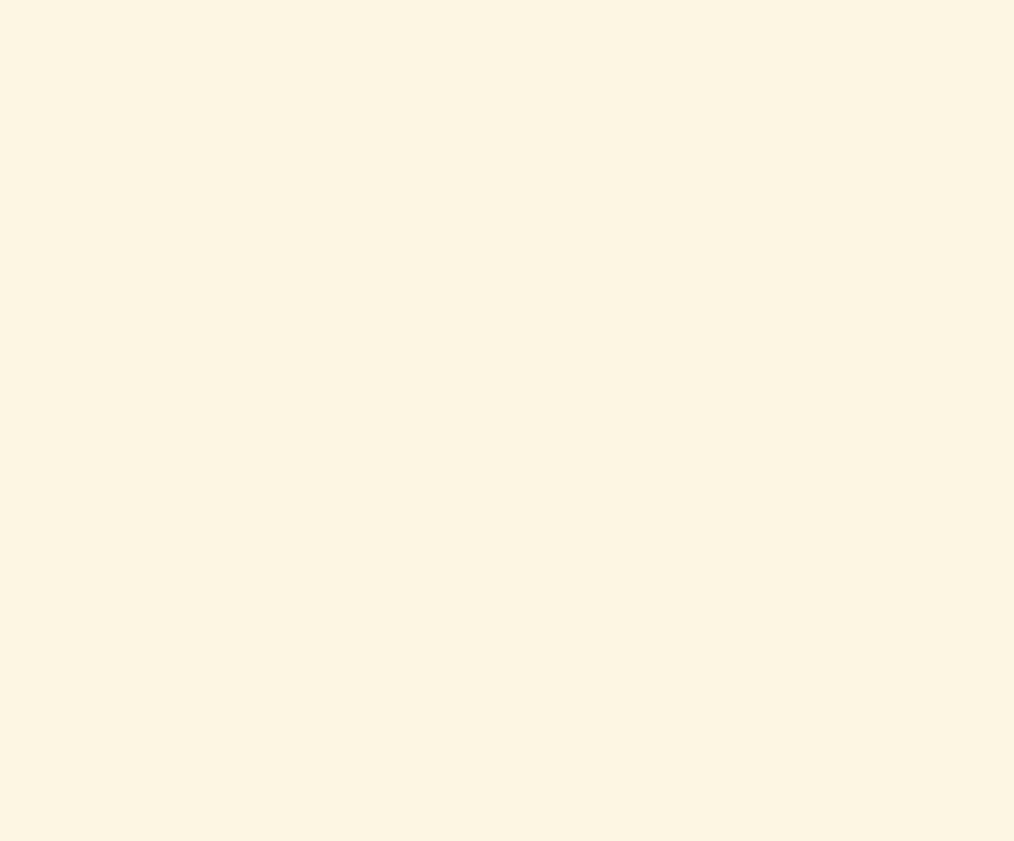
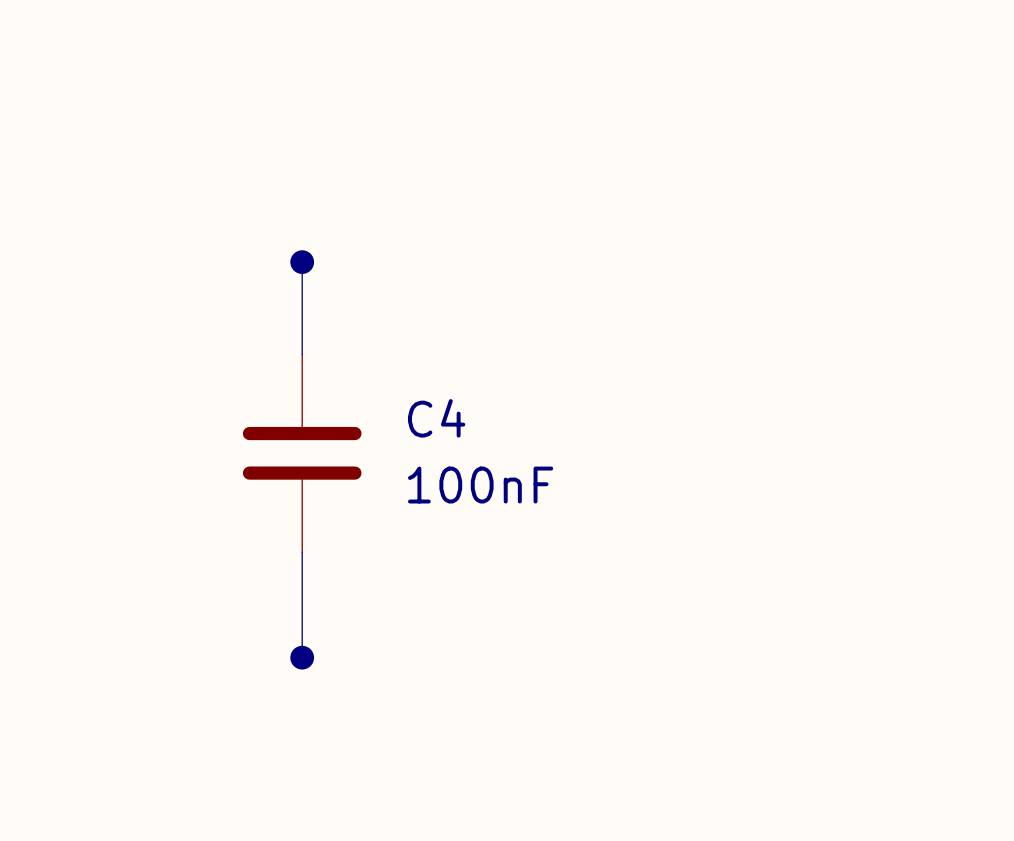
wire: none -> (302, 262) (302, 354)
junction: none -> (302, 262)
C4: none -> 100nF (302, 453)
wire: none -> (302, 552) (302, 657)
junction: none -> (302, 657)

